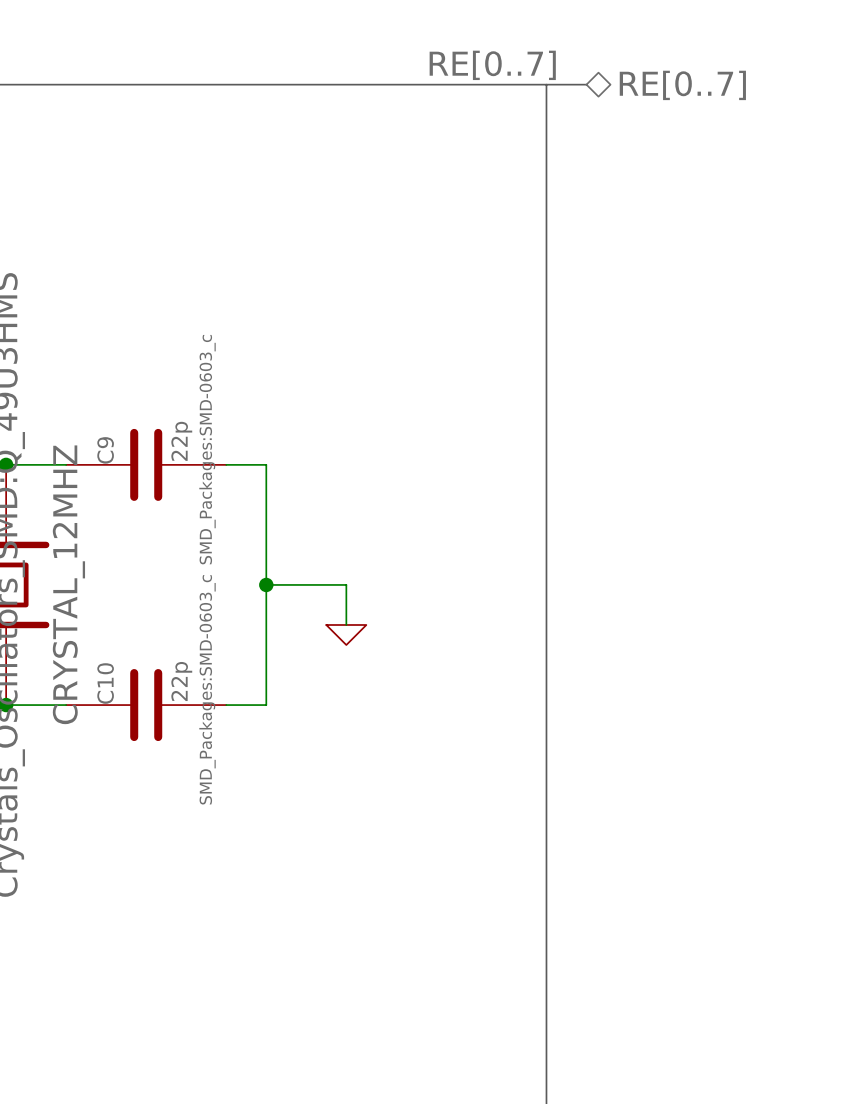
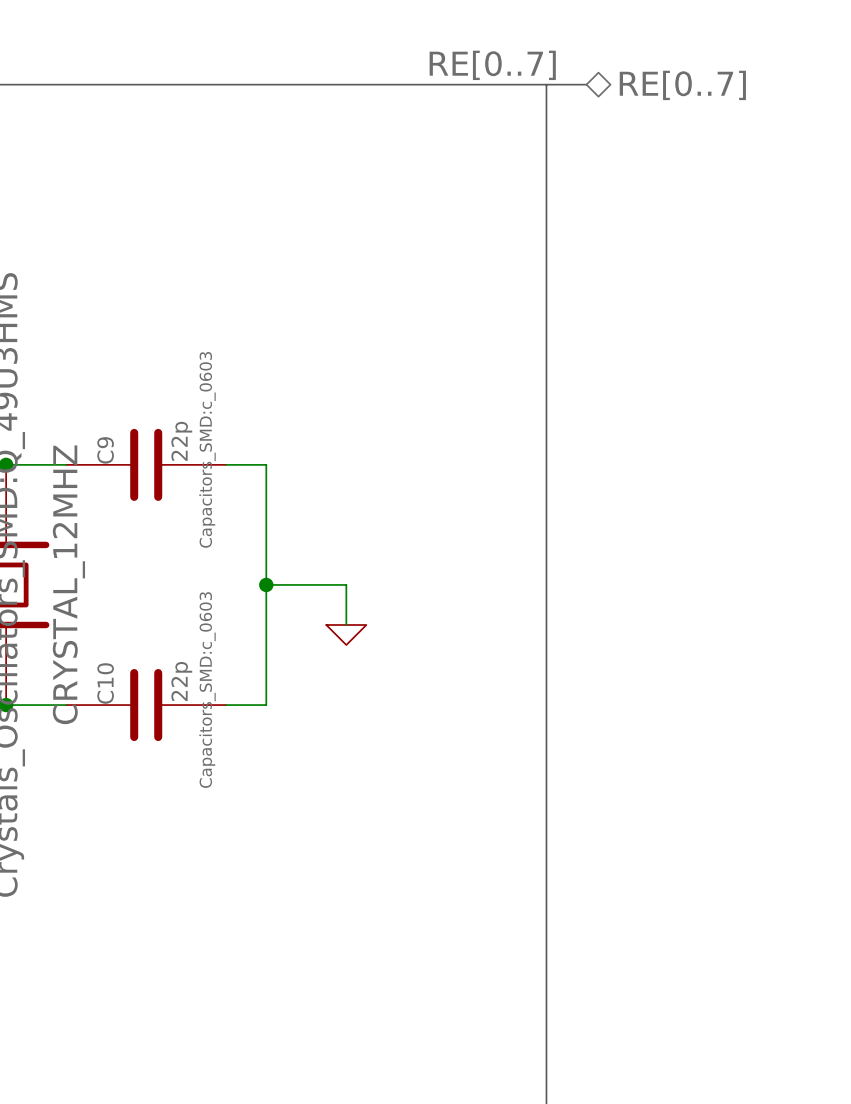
C9 text: SMD_Packages:SMD-0603_c (207, 449) -> Capacitors_SMD:c_0603 (207, 449)
C10 text: SMD_Packages:SMD-0603_c (207, 689) -> Capacitors_SMD:c_0603 (207, 690)

